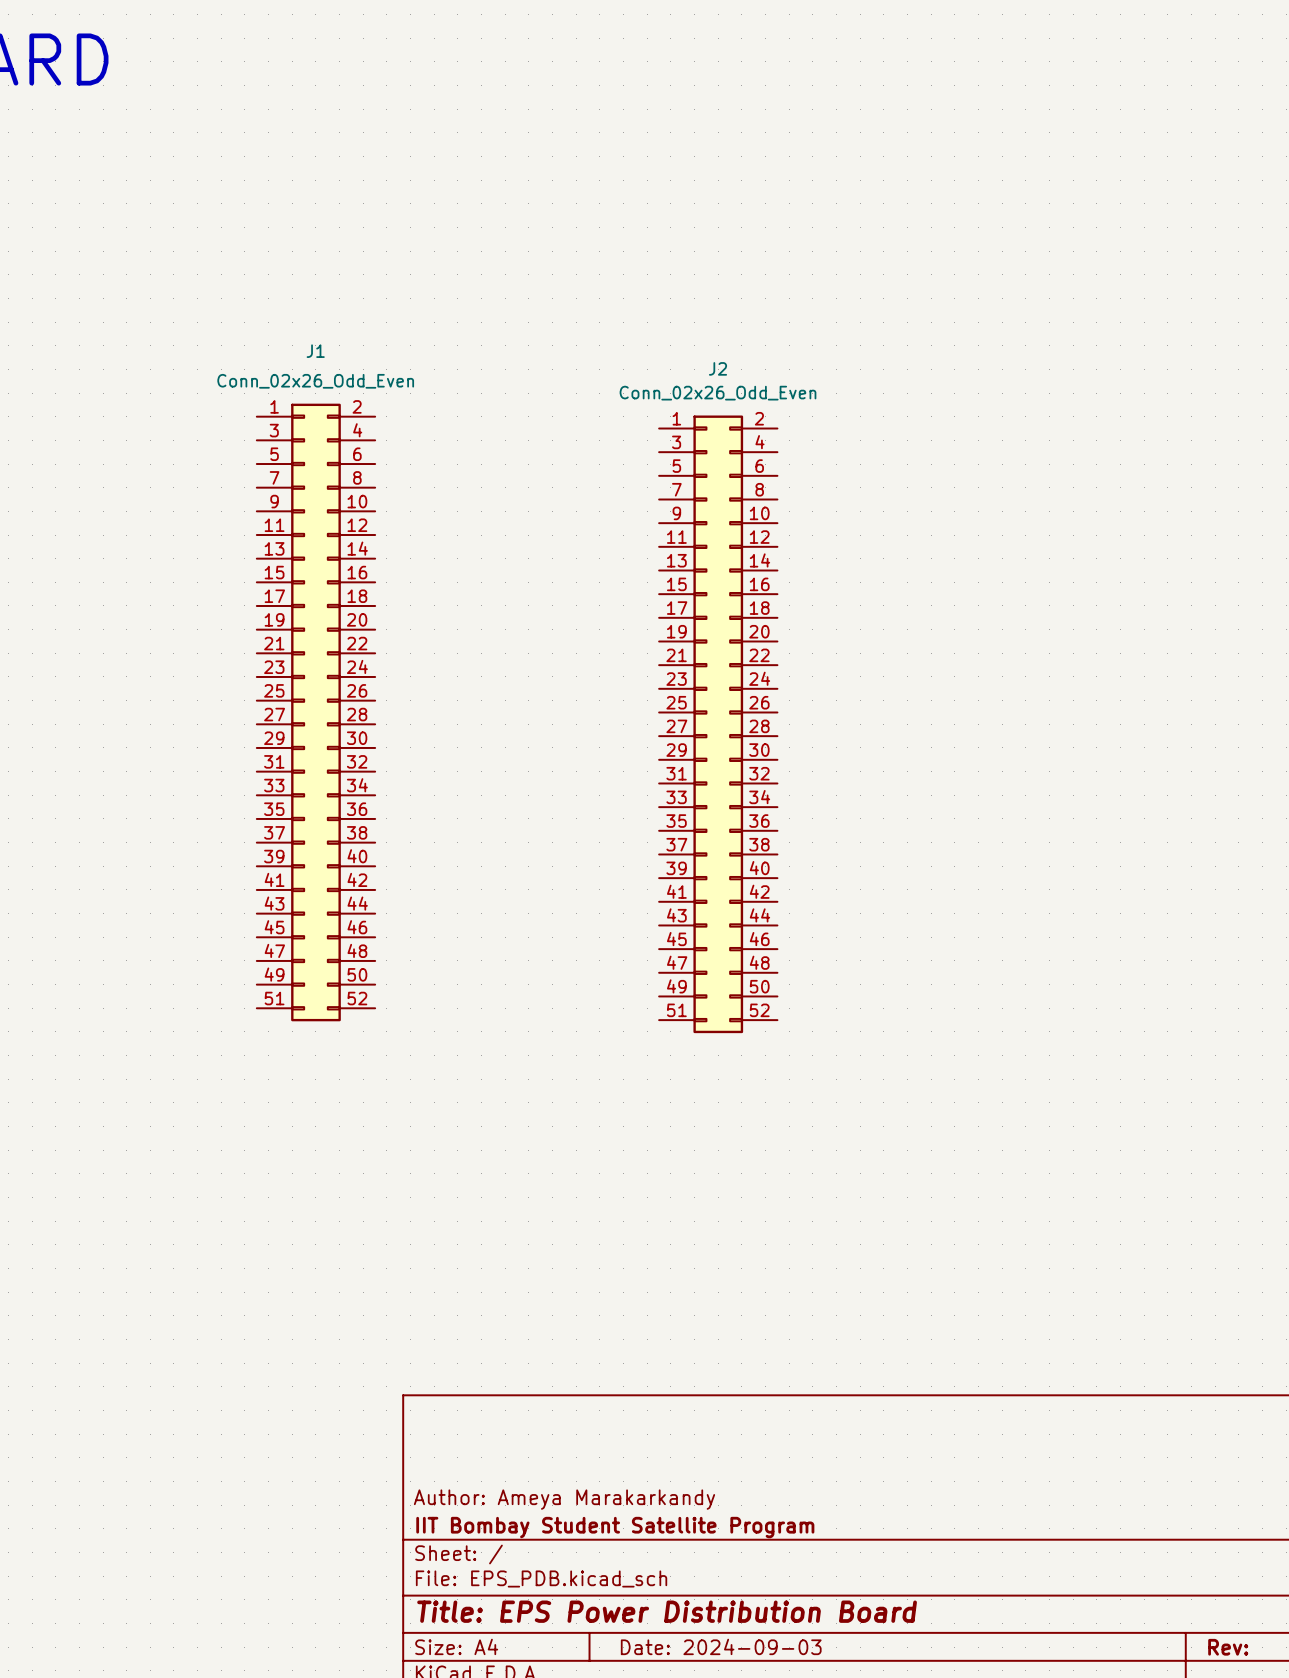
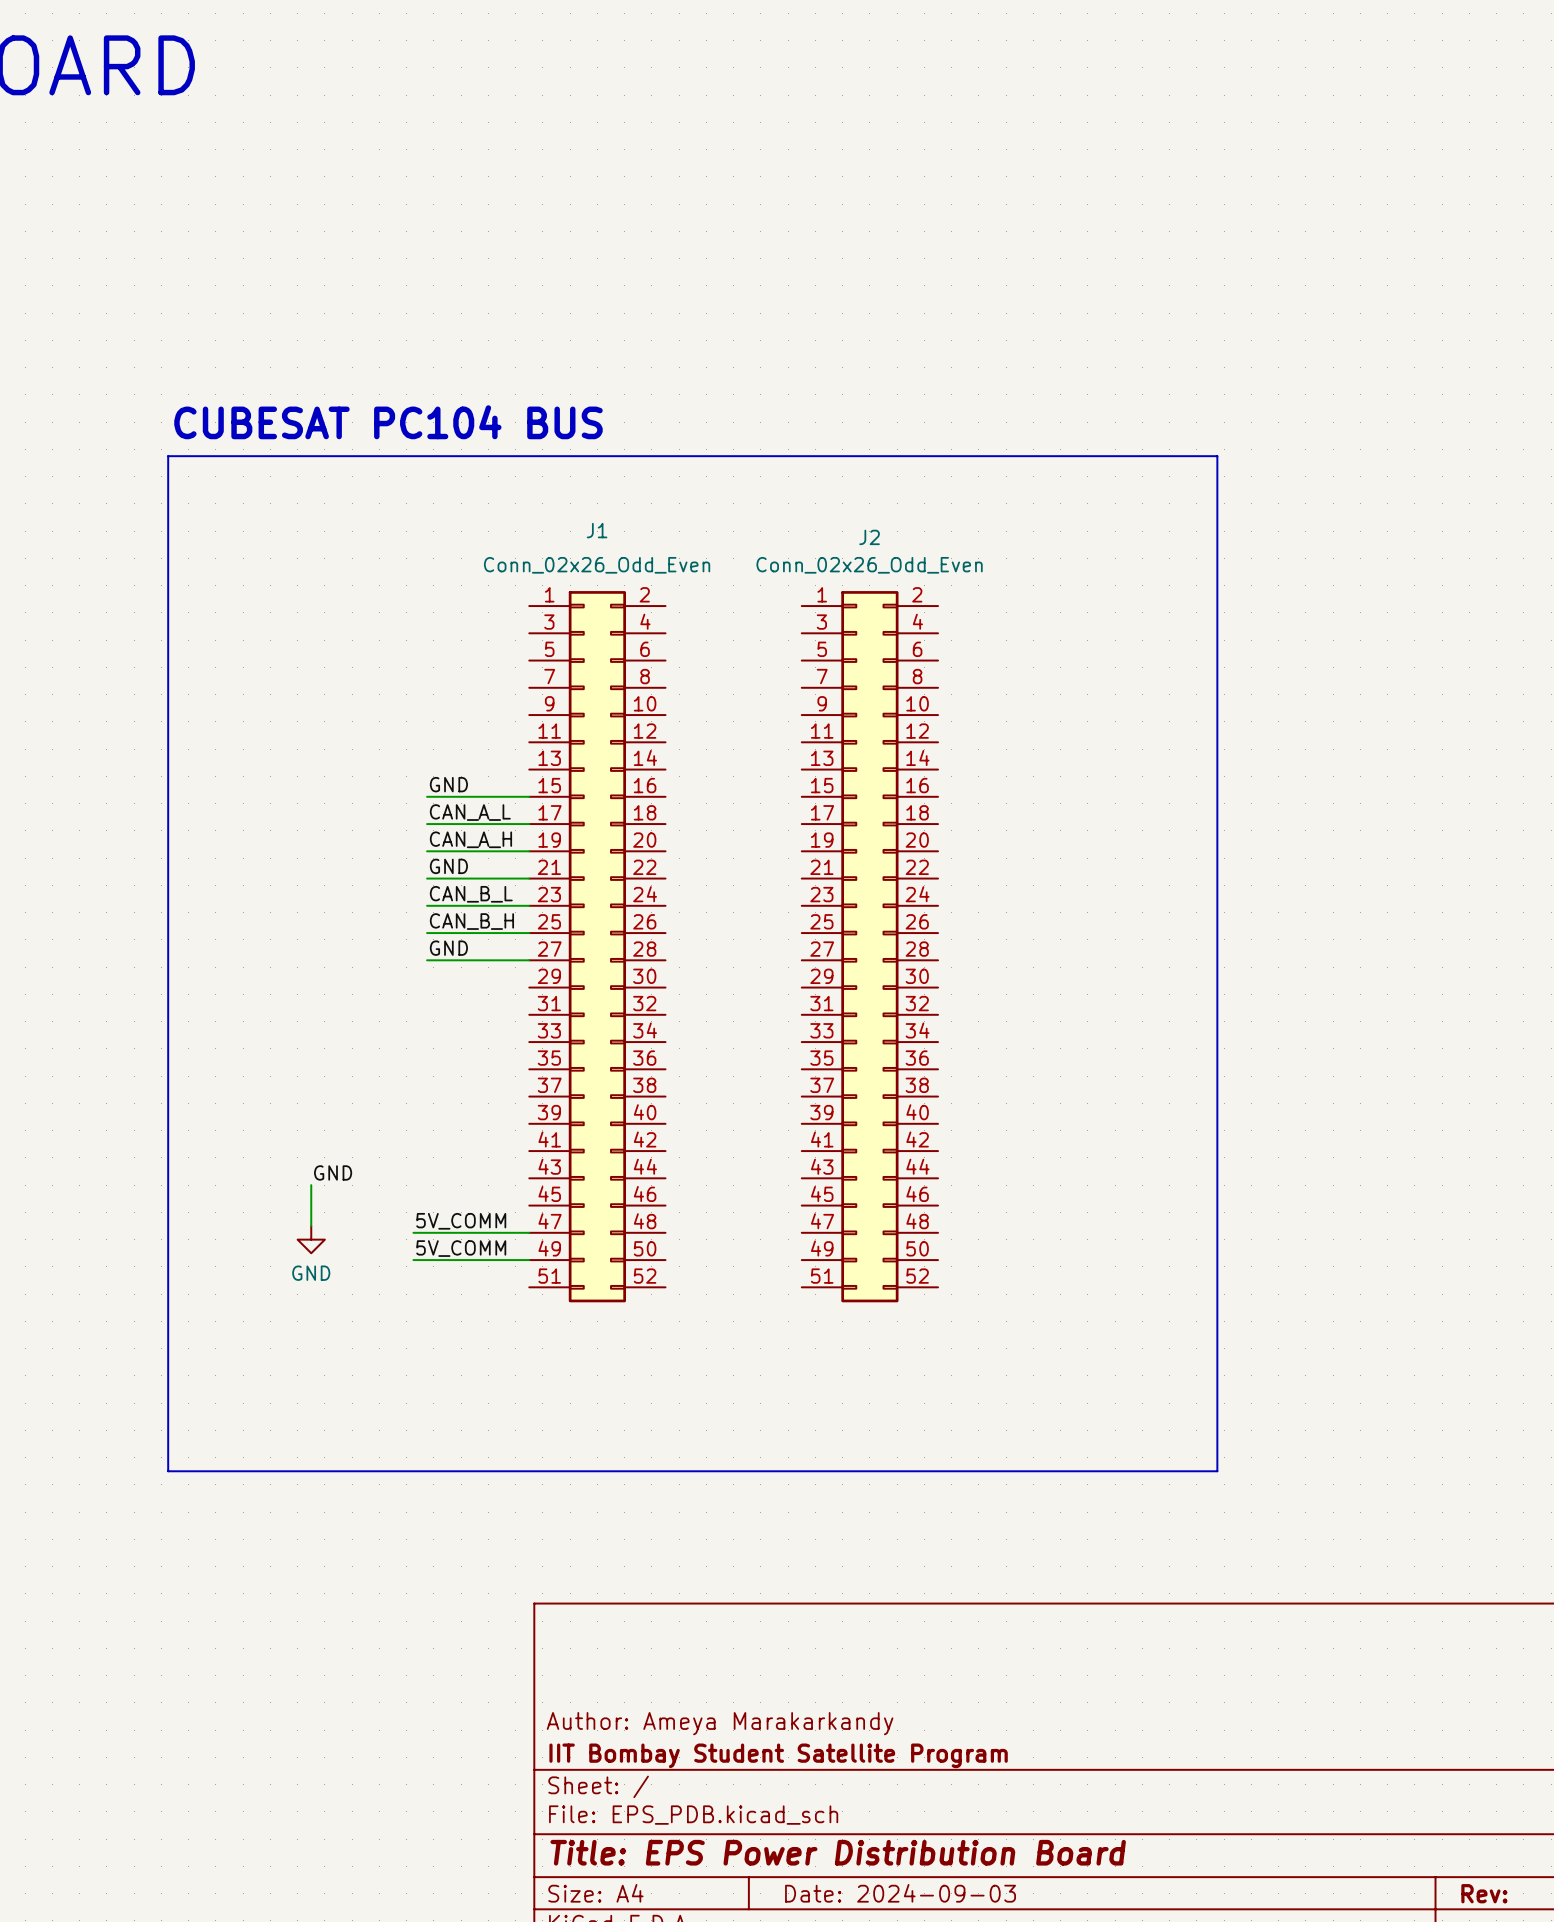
text: none -> CUBESAT PC104 BUS (388, 422)
line: none -> (168, 456) (1217, 456) (1217, 1471) (168, 1471) (168, 456)
label: none -> GND (448, 784)
wire: none -> (427, 796) (529, 796)
label: none -> CAN_A_L (470, 812)
J1 position: (315, 712) -> (597, 946)
wire: none -> (427, 824) (529, 824)
J2 position: (718, 724) -> (869, 946)
label: none -> CAN_A_H (470, 839)
wire: none -> (427, 851) (529, 851)
label: none -> GND (448, 866)
wire: none -> (427, 878) (529, 878)
label: none -> CAN_B_L (471, 894)
wire: none -> (427, 905) (529, 905)
label: none -> CAN_B_H (471, 921)
wire: none -> (427, 933) (529, 933)
label: none -> GND (448, 948)
wire: none -> (427, 960) (529, 960)
label: none -> GND (333, 1172)
wire: none -> (311, 1185) (311, 1226)
label: none -> 5V_COMM (461, 1221)
wire: none -> (413, 1232) (529, 1232)
power symbol: none -> GND (311, 1239)
label: none -> 5V_COMM (461, 1248)
wire: none -> (413, 1260) (529, 1260)

